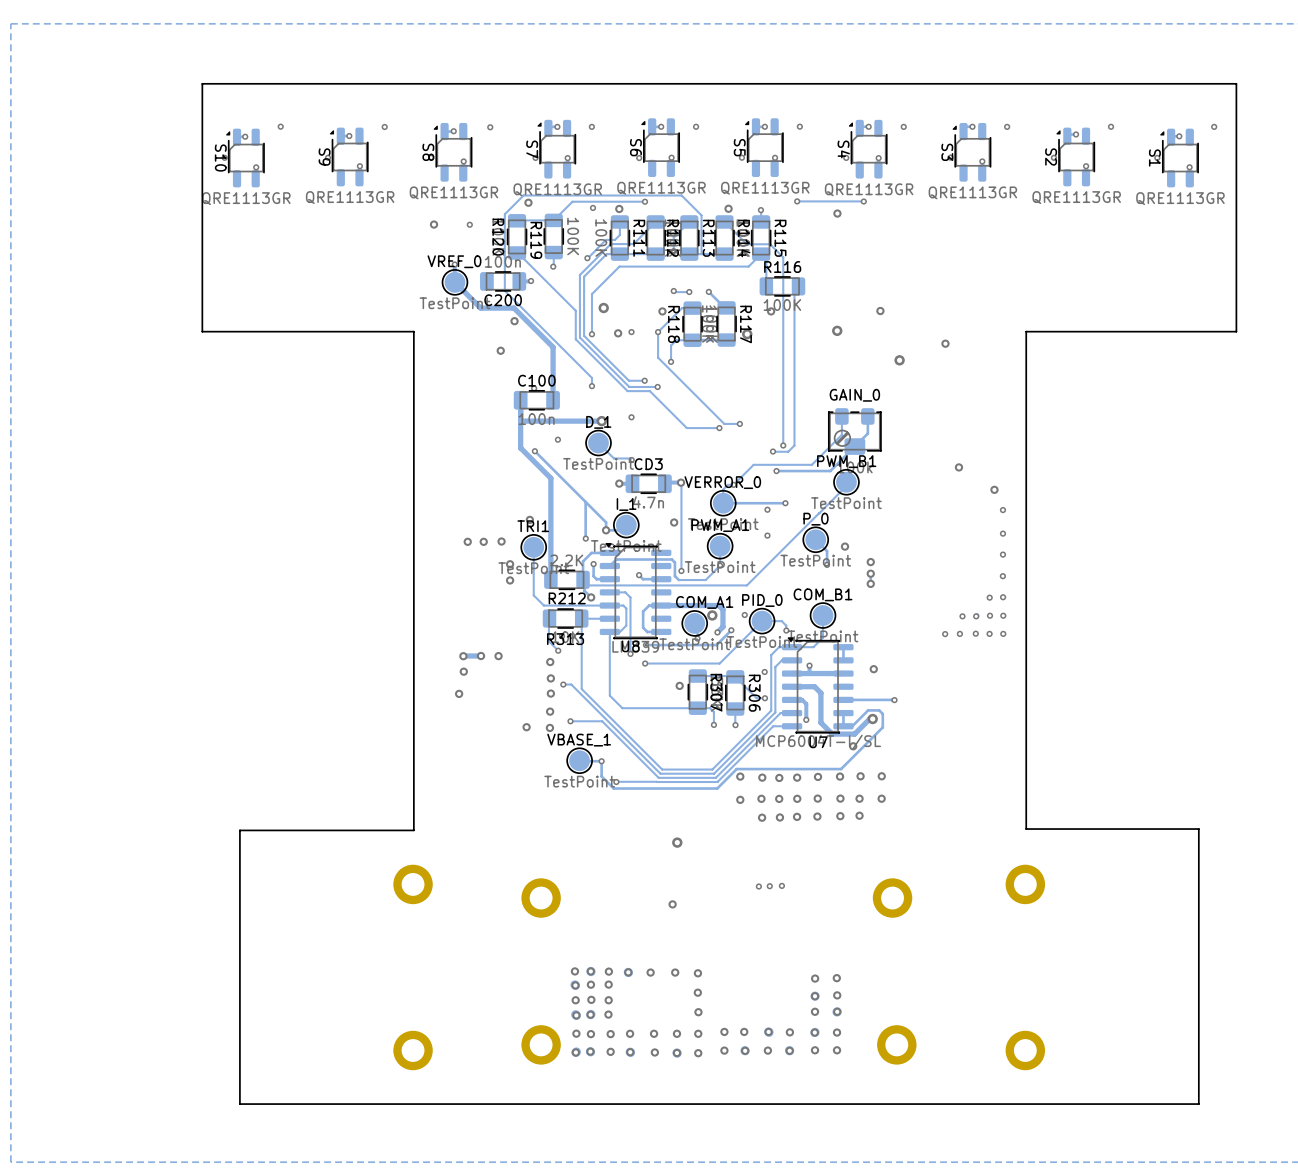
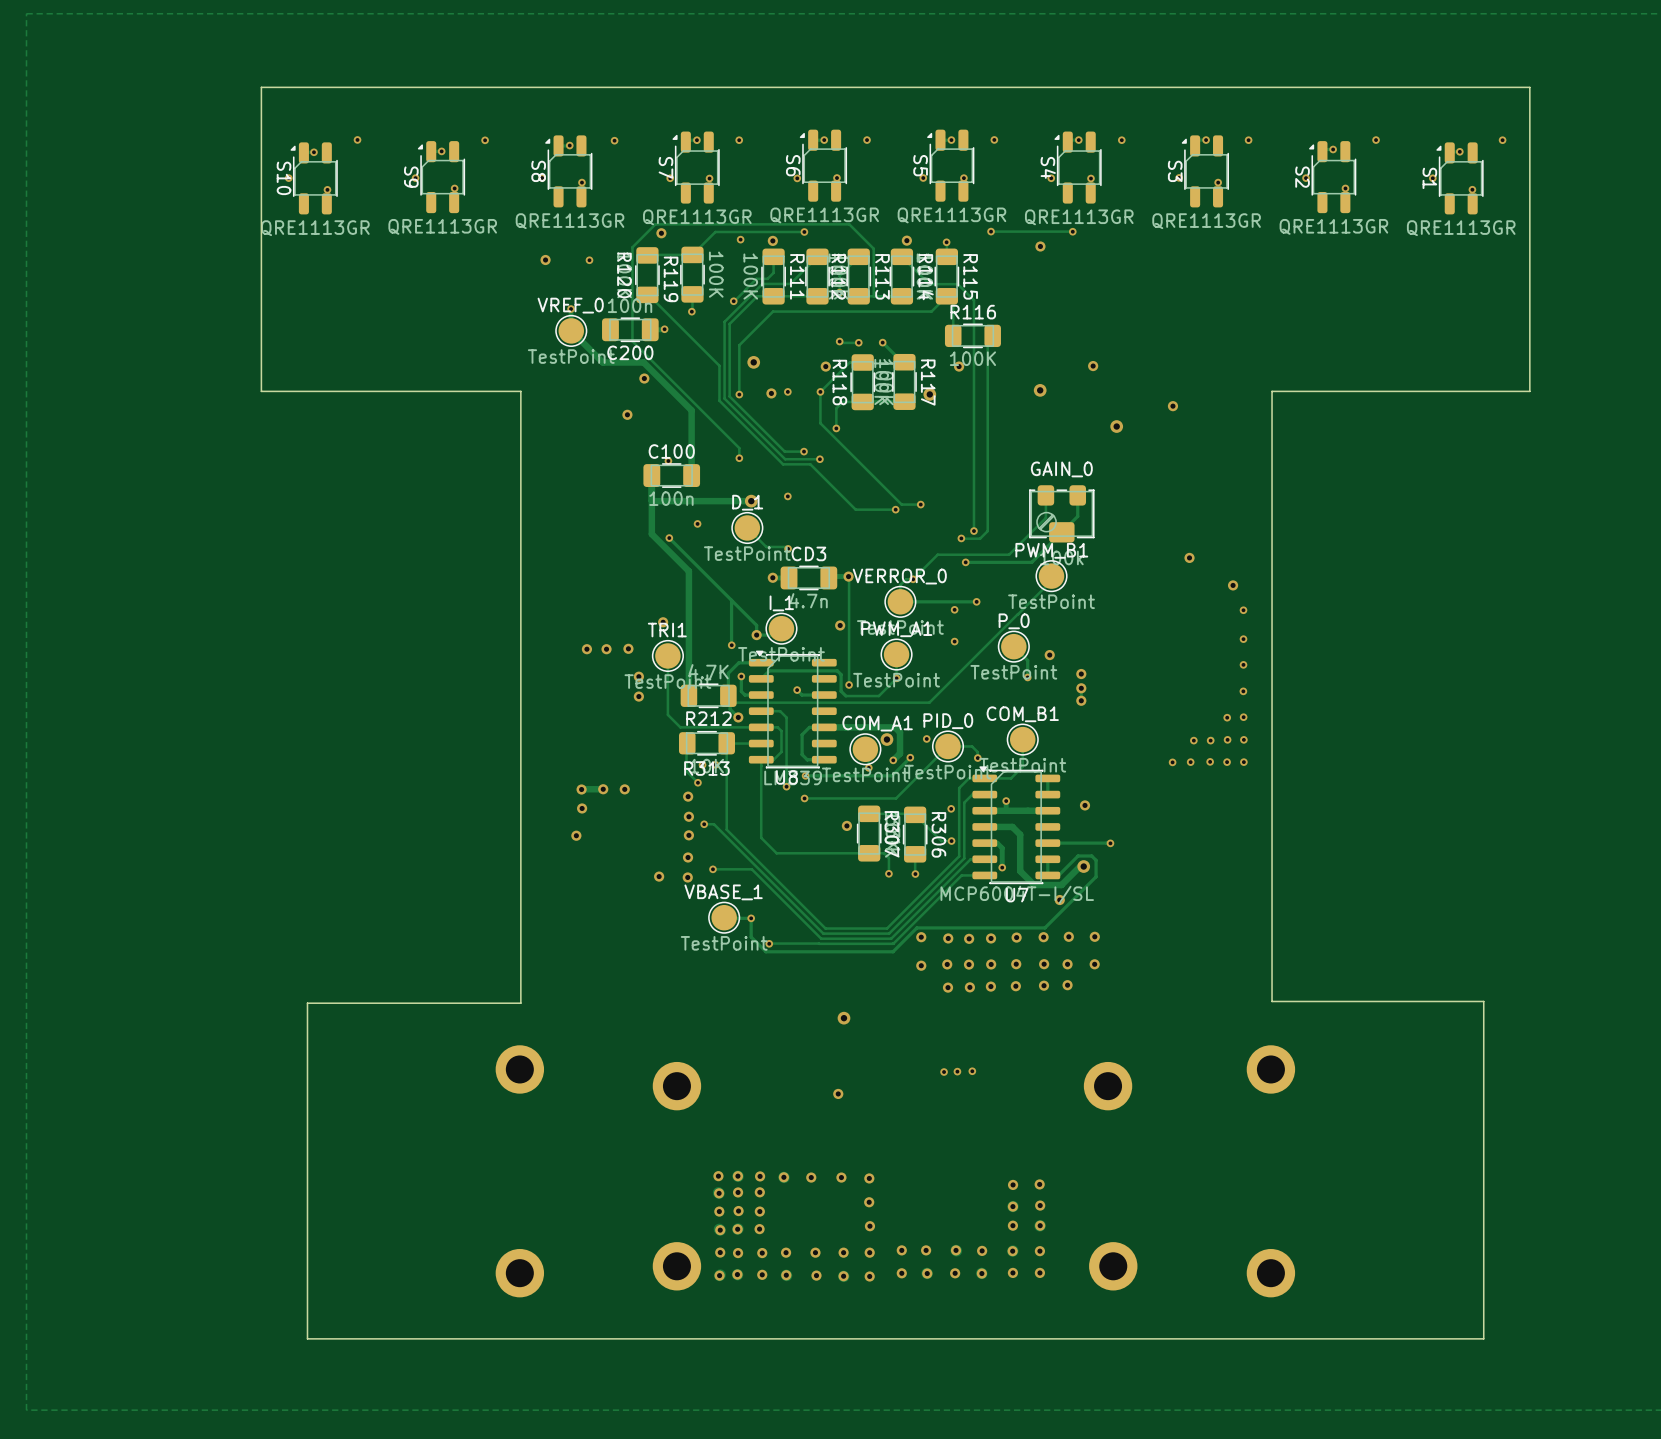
R212 value: 2.2K (566, 560) -> 4.7K (708, 671)

